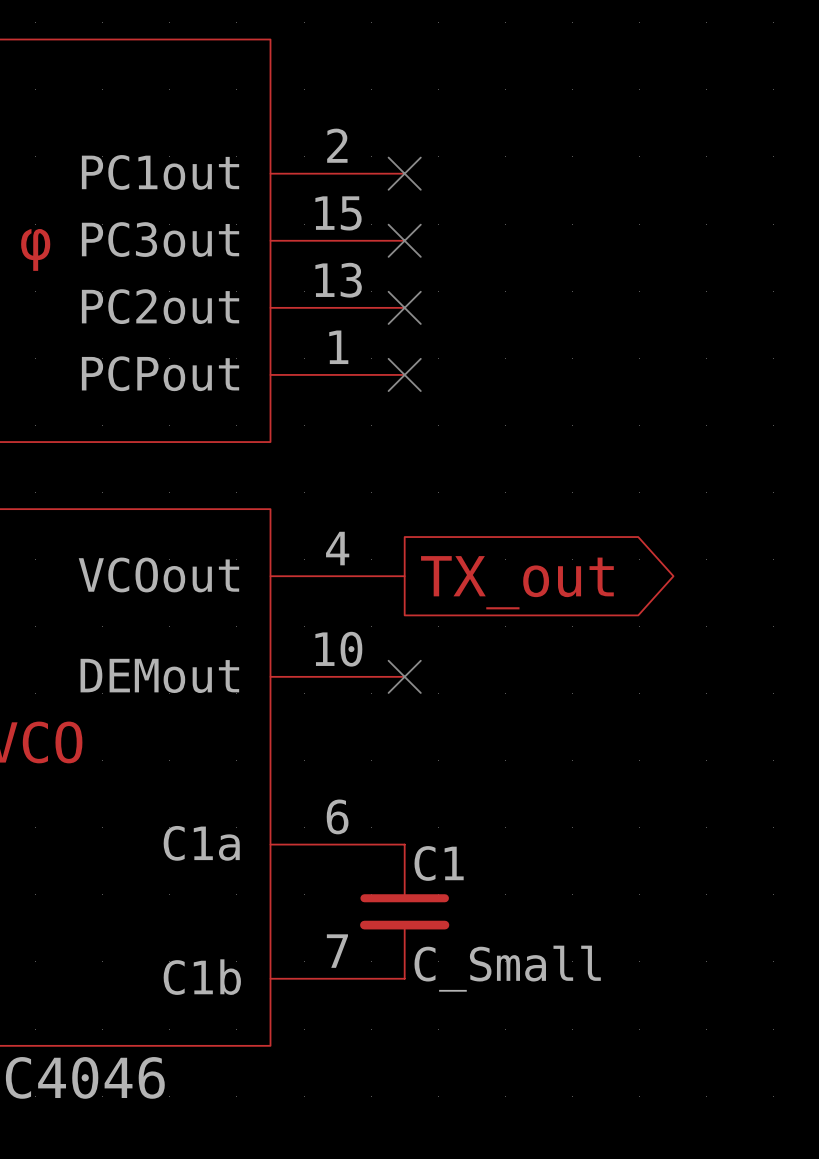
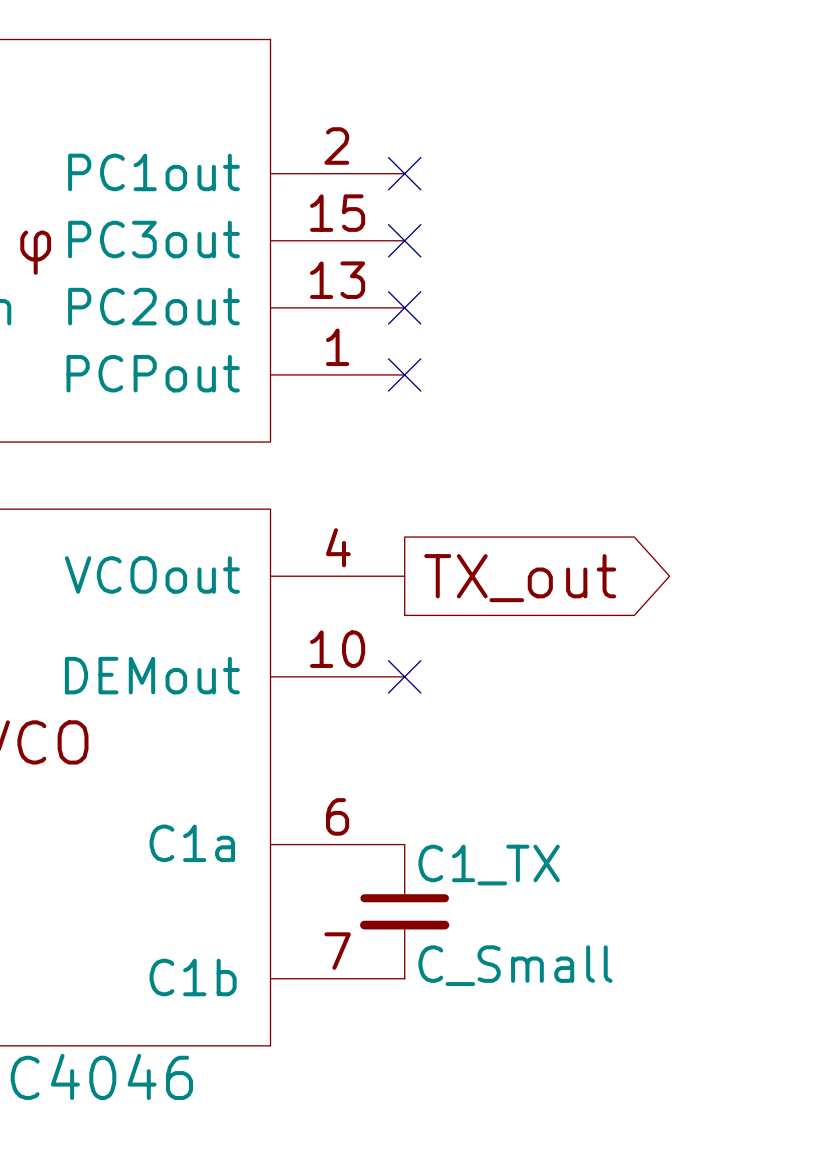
C1 name: C1 (439, 863) -> C1_TX (489, 865)

